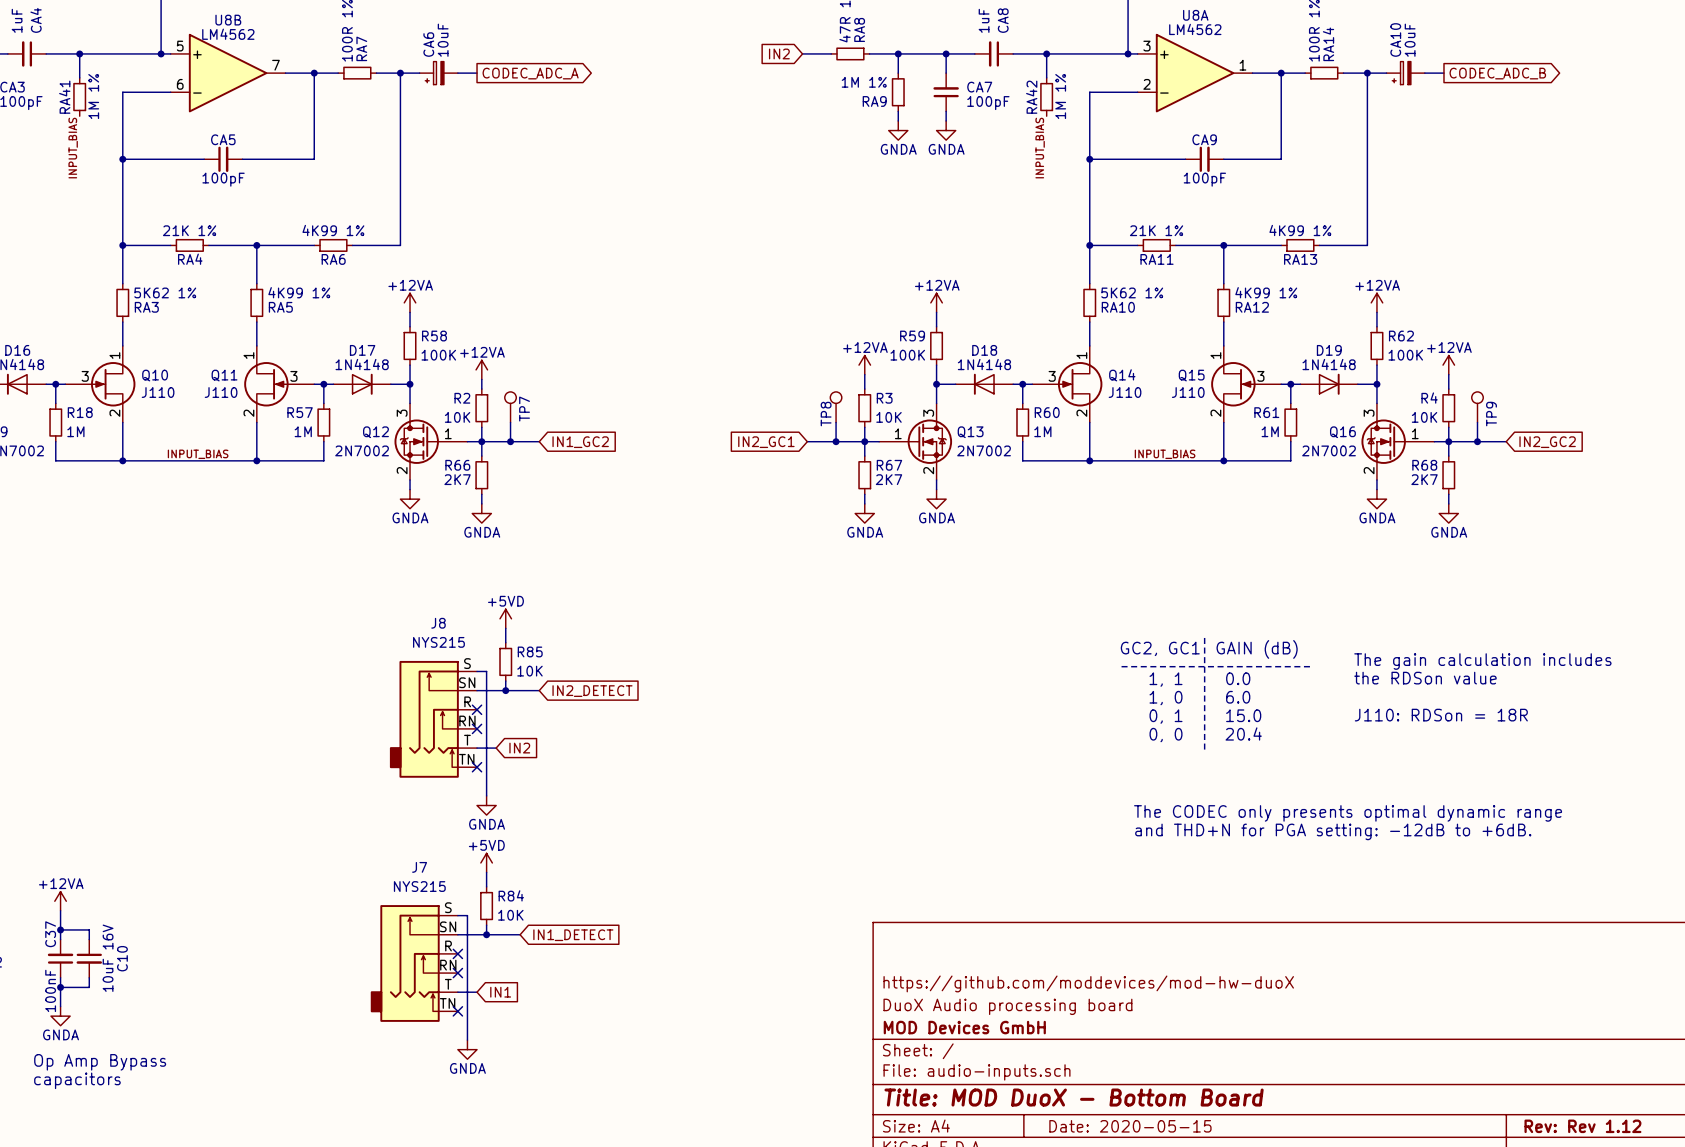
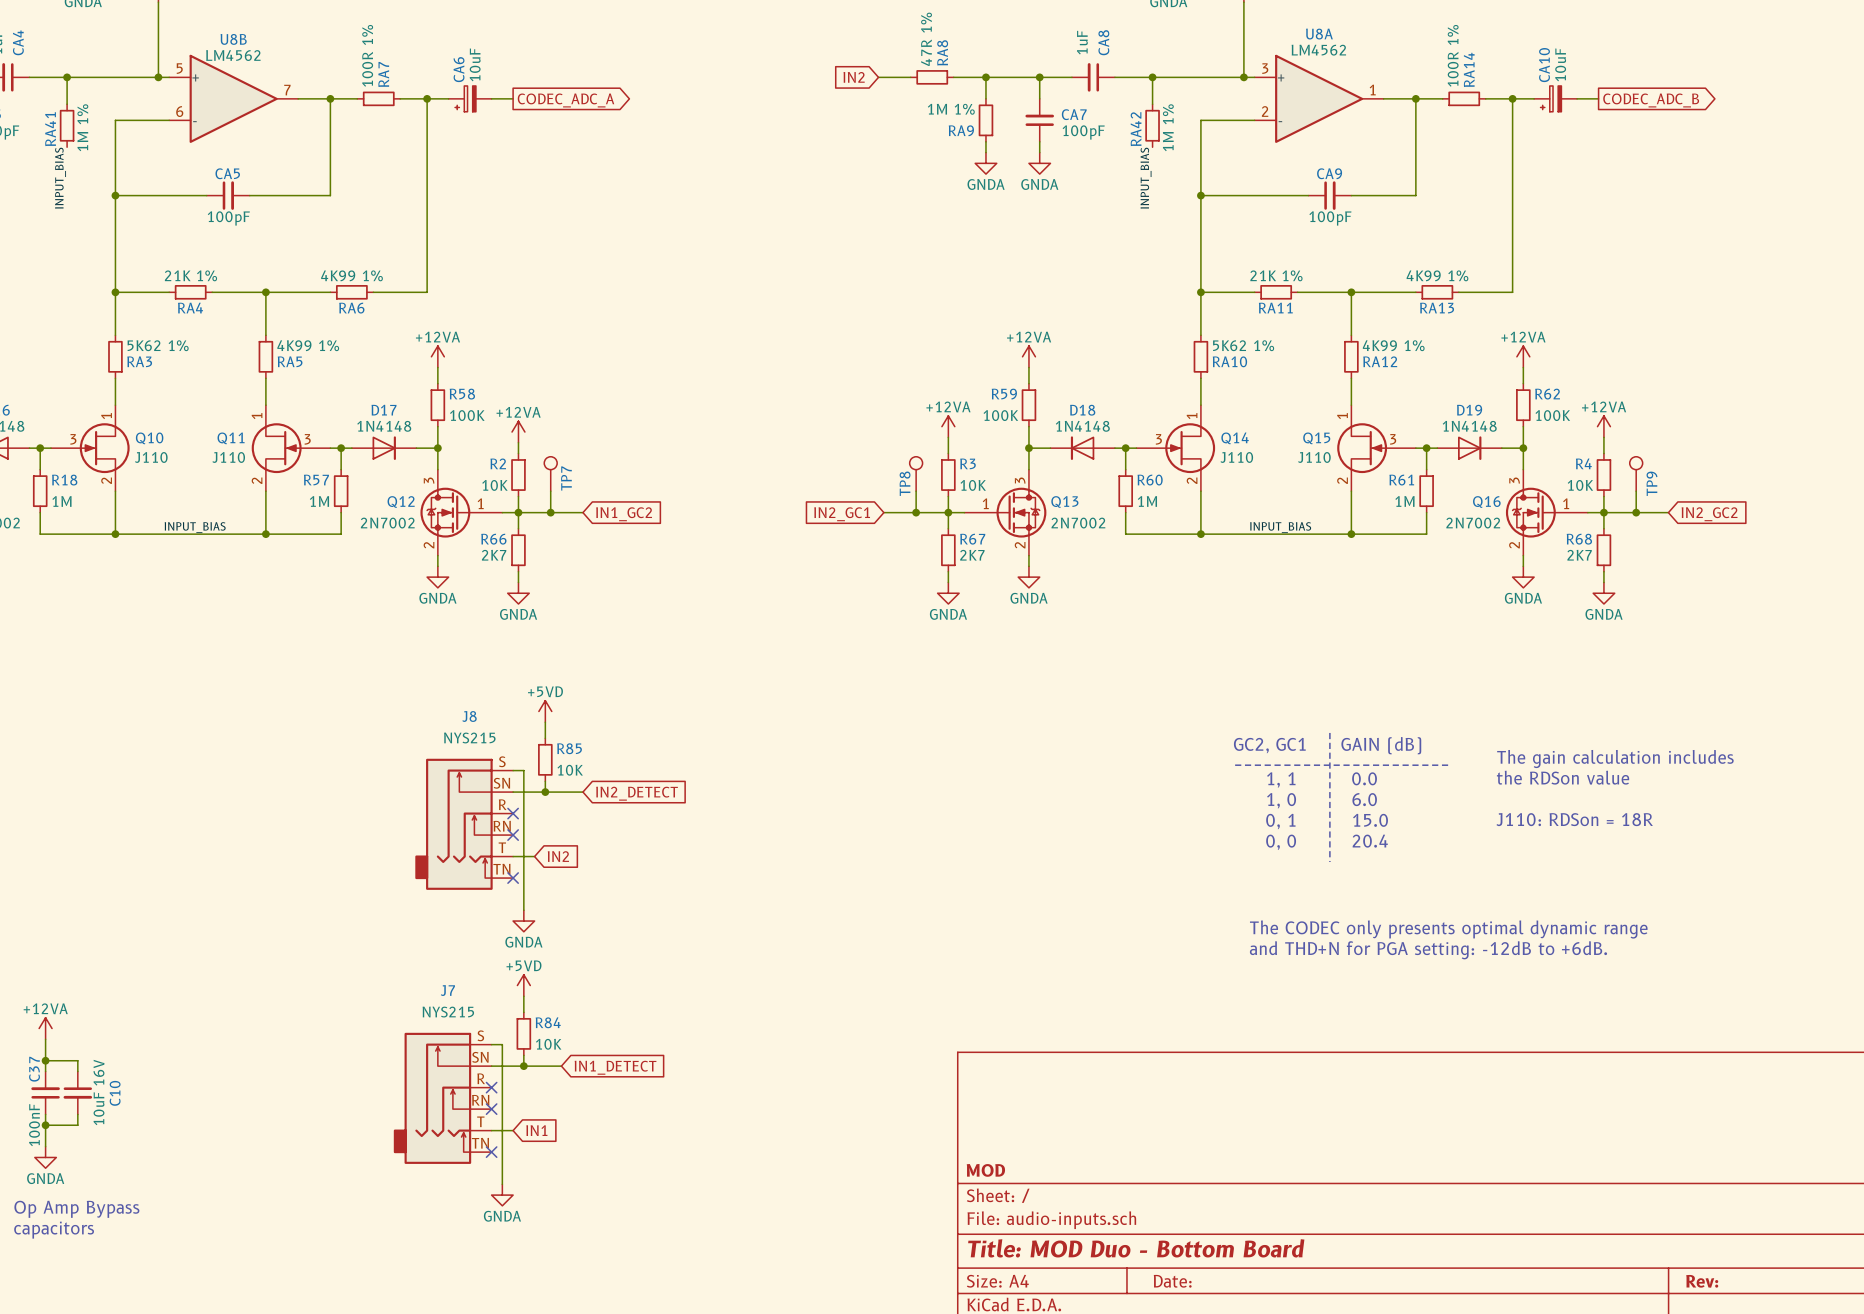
title block: https://github.com/moddevices/mod-hw-duoX (1088, 983) -> none
title block: DuoX Audio processing board (1007, 1006) -> none
title block: MOD Devices GmbH (964, 1027) -> MOD (985, 1170)
title block: Title: MOD DuoX - Bottom Board (1074, 1097) -> Title: MOD Duo - Bottom Board (1136, 1248)
title block: Date: 2020-05-15 (1130, 1126) -> Date: (1172, 1281)
title block: Rev: Rev 1.12 (1582, 1126) -> Rev: (1702, 1281)

